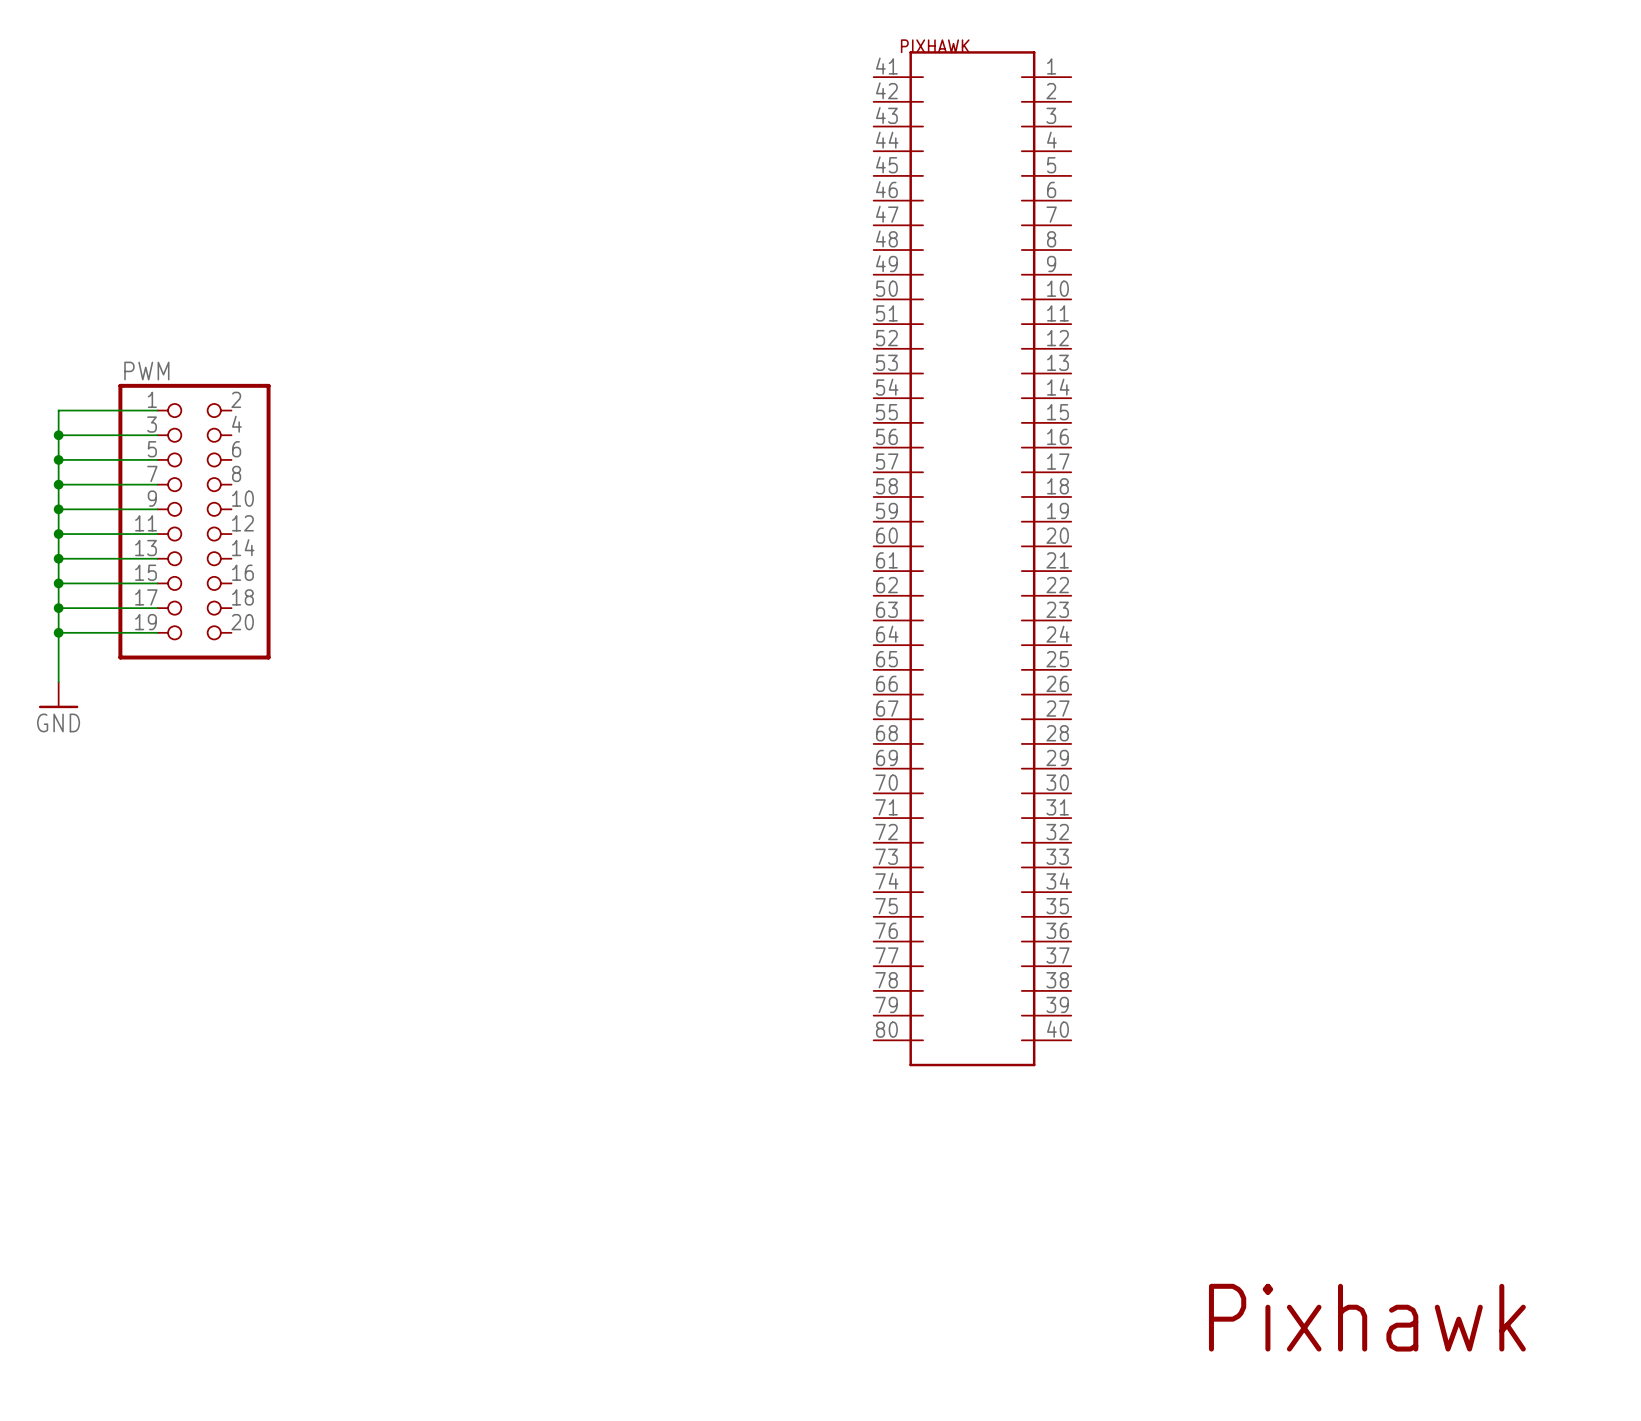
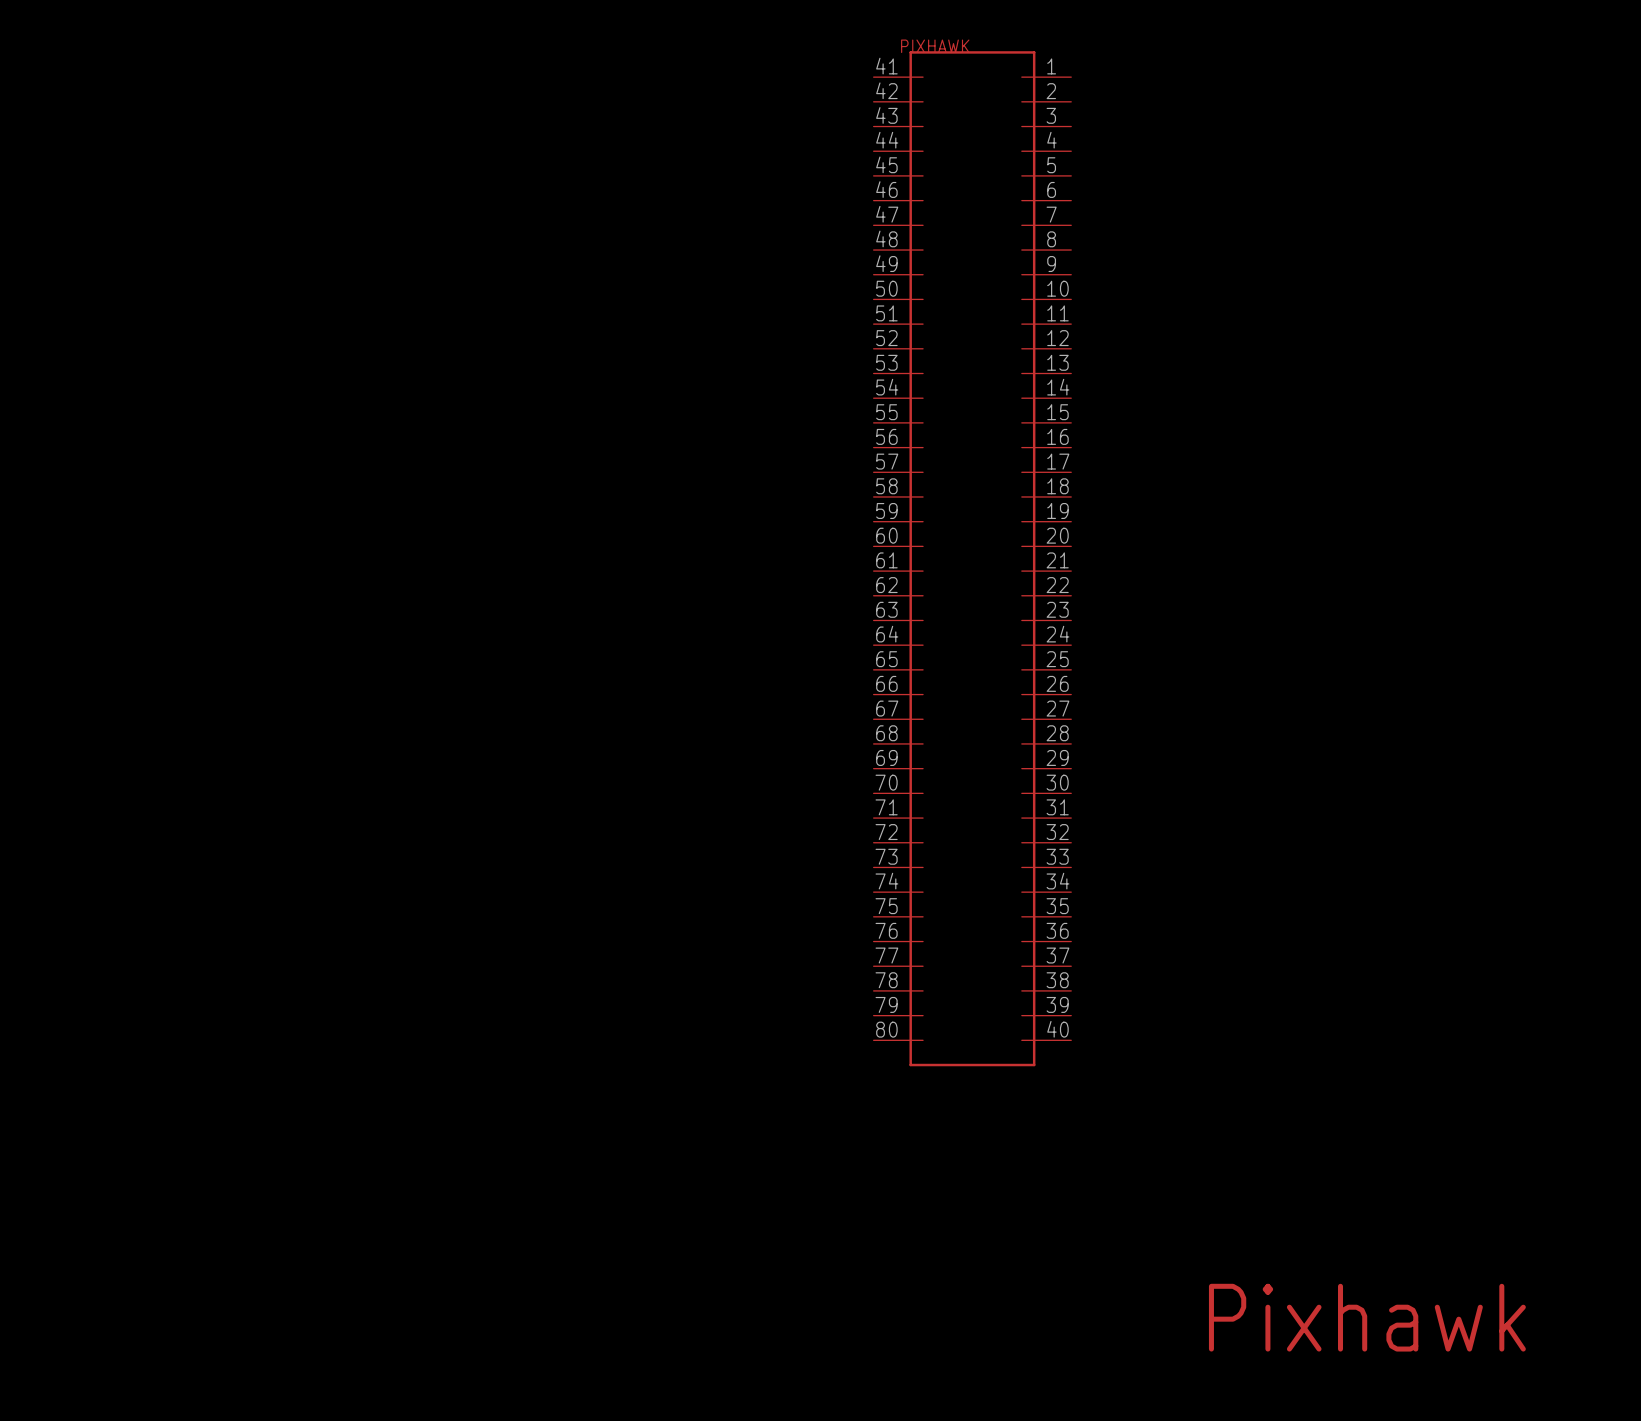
wire: (157, 410) (58, 410) (58, 682) -> none
wire: (58, 435) (157, 435) -> none
junction: (58, 435) -> none
wire: (58, 459) (157, 459) -> none
junction: (58, 459) -> none
wire: (58, 484) (157, 484) -> none
junction: (58, 484) -> none
wire: (58, 509) (157, 509) -> none
junction: (58, 509) -> none
PWM: (194, 521) -> none
wire: (58, 534) (157, 534) -> none
junction: (58, 534) -> none
wire: (58, 558) (157, 558) -> none
junction: (58, 558) -> none
wire: (58, 583) (157, 583) -> none
junction: (58, 583) -> none
wire: (58, 608) (157, 608) -> none
junction: (58, 608) -> none
wire: (58, 632) (157, 632) -> none
junction: (58, 632) -> none
power symbol: GND (58, 695) -> none

